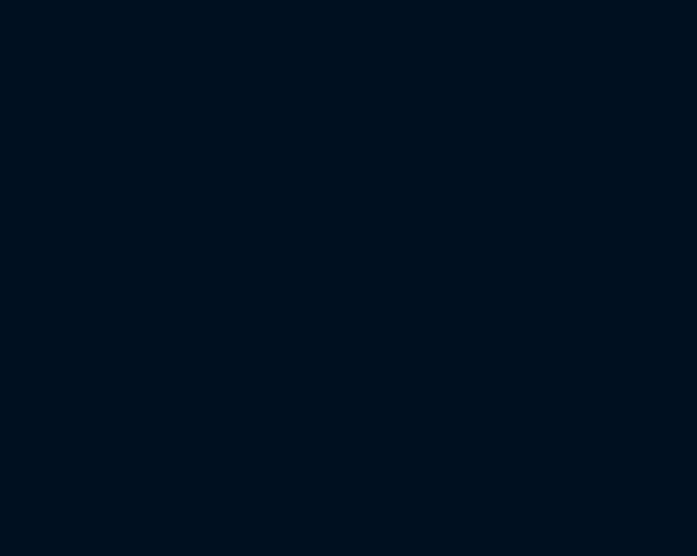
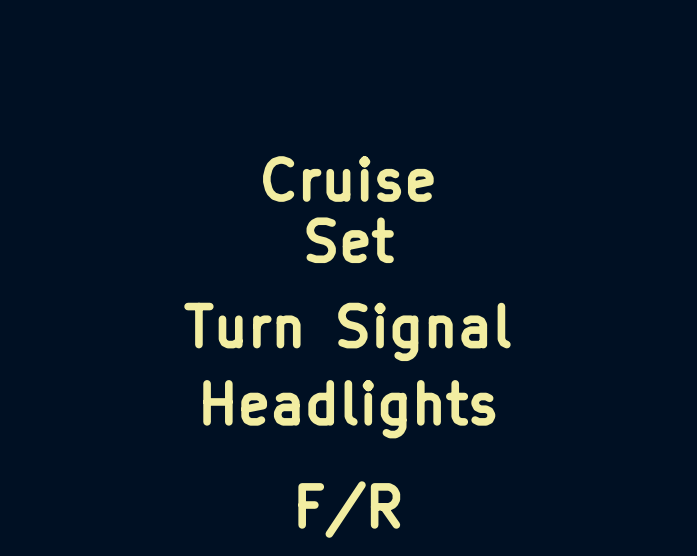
text: none -> Cruise (348, 179)
text: none -> Set (350, 240)
text: none -> Turn Signal (347, 331)
text: none -> Headlights (349, 409)
text: none -> F/R (349, 509)

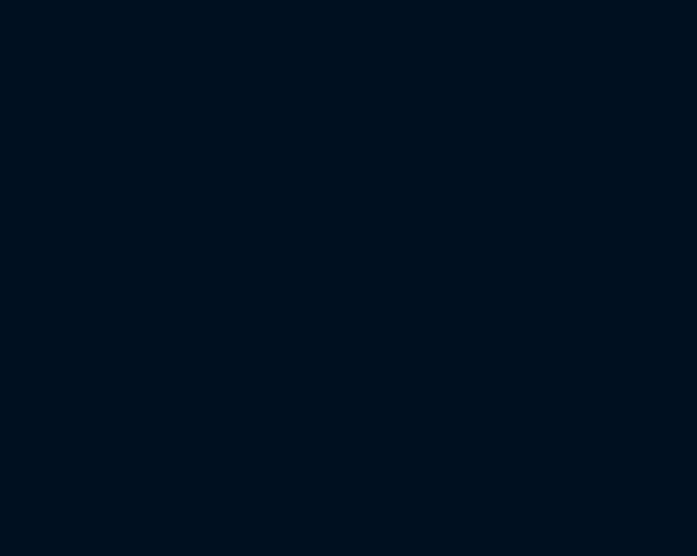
text: Cruise (348, 179) -> none
text: Set (350, 240) -> none
text: Turn Signal (347, 331) -> none
text: Headlights (349, 409) -> none
text: F/R (349, 509) -> none

